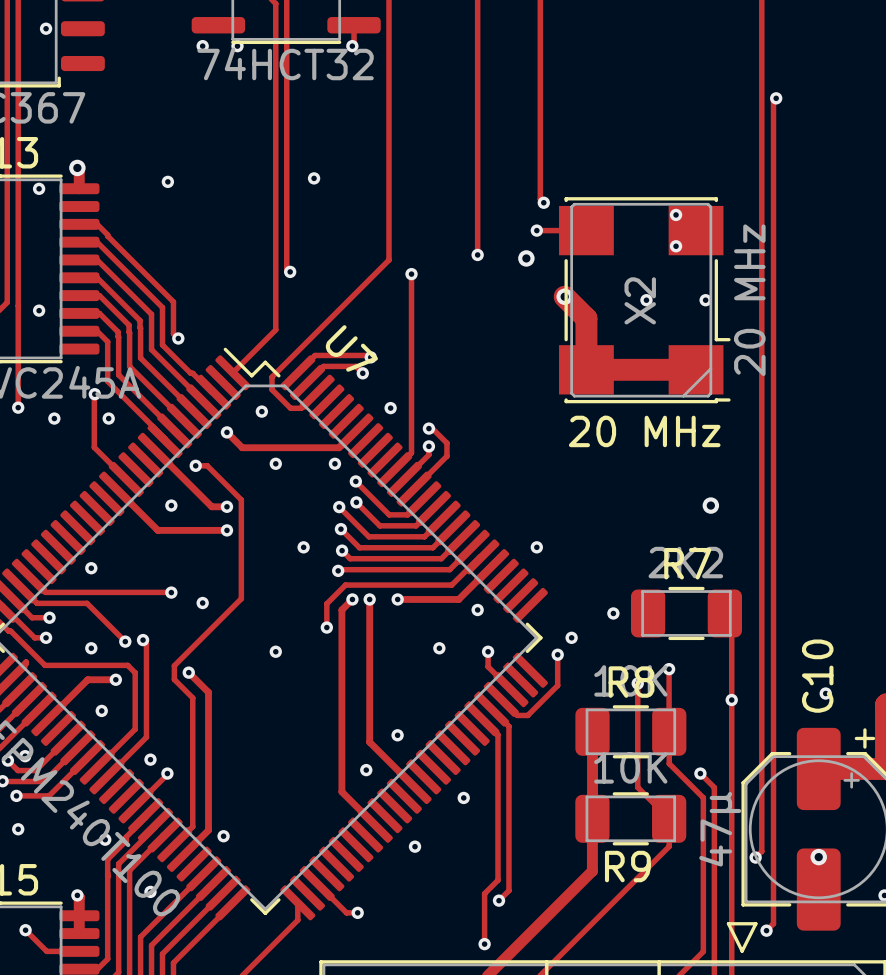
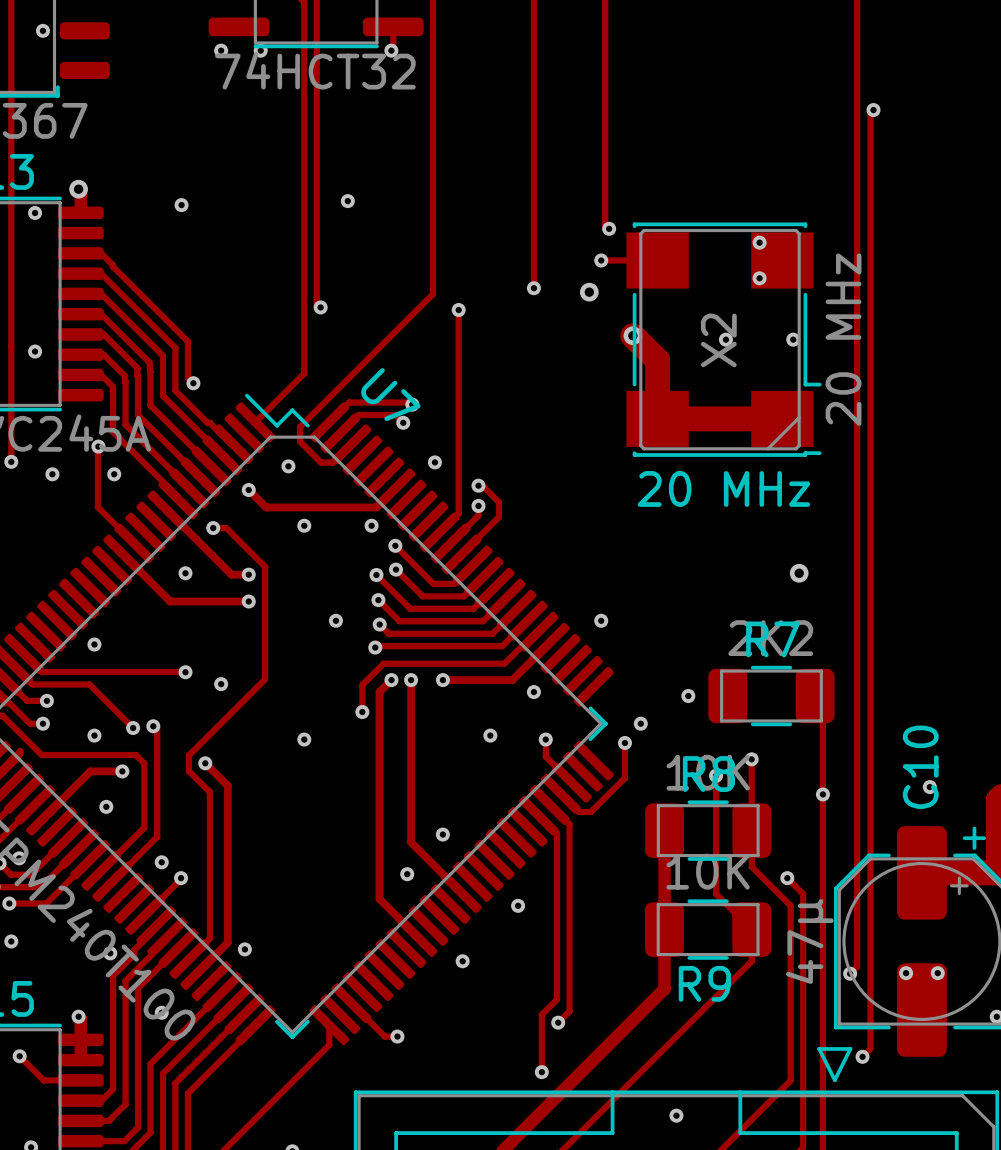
via: none -> (906, 973)
via: (818, 857) -> none
via: none -> (937, 973)

